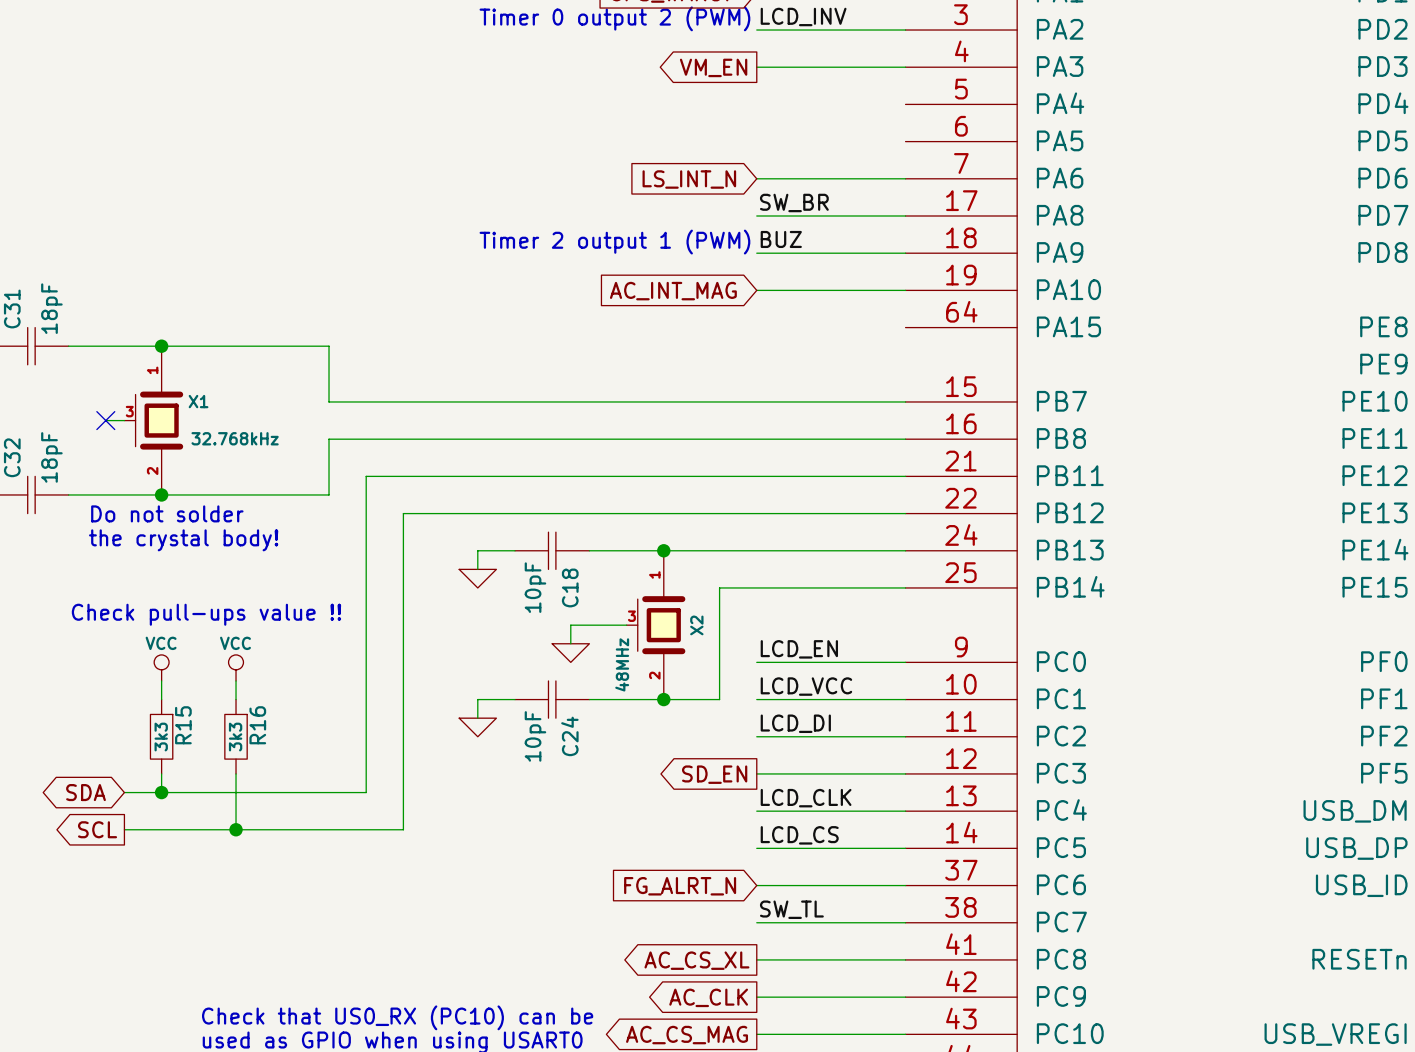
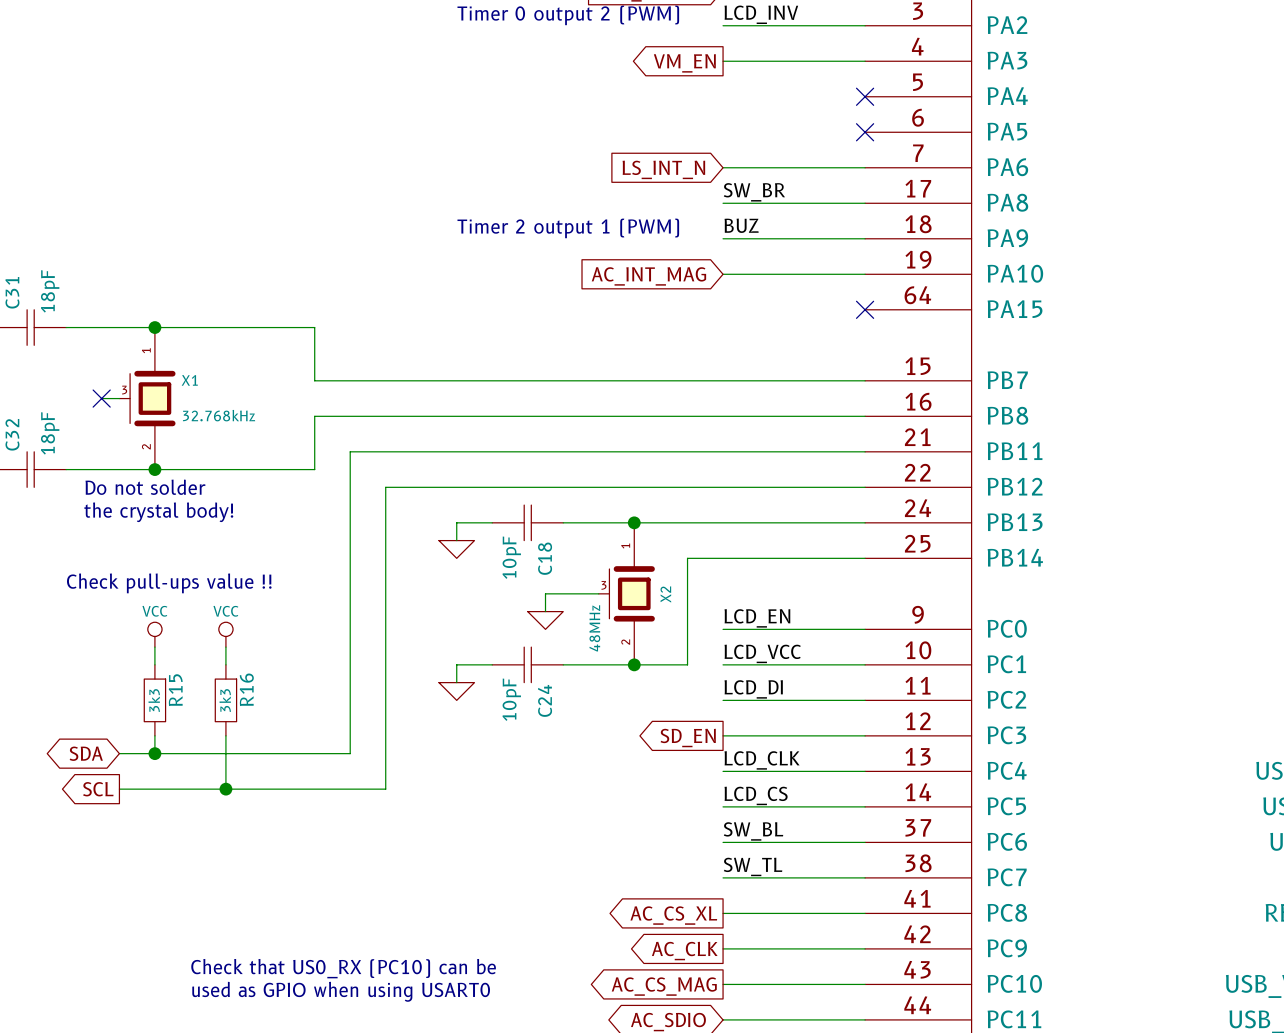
no-connect mark: none -> (865, 96)
no-connect mark: none -> (865, 132)
no-connect mark: none -> (865, 309)
label: none -> SW_BL (753, 831)
global label: FG_ALRT_N (680, 886) -> none

